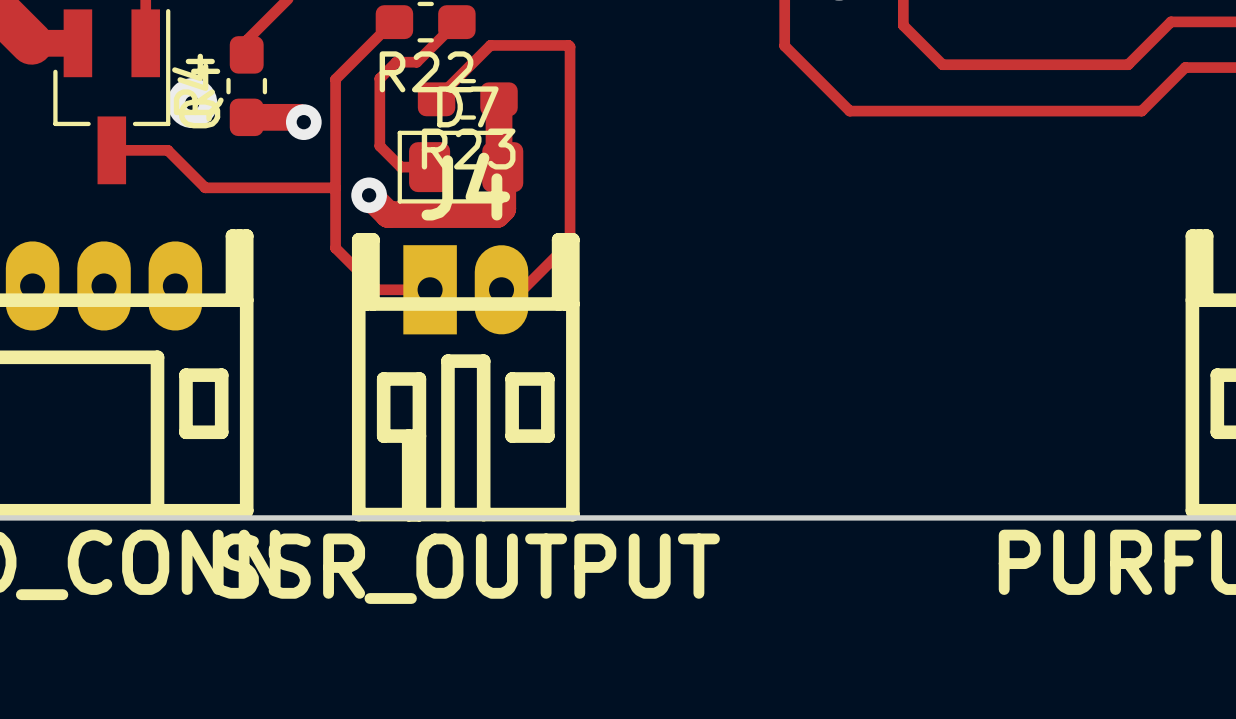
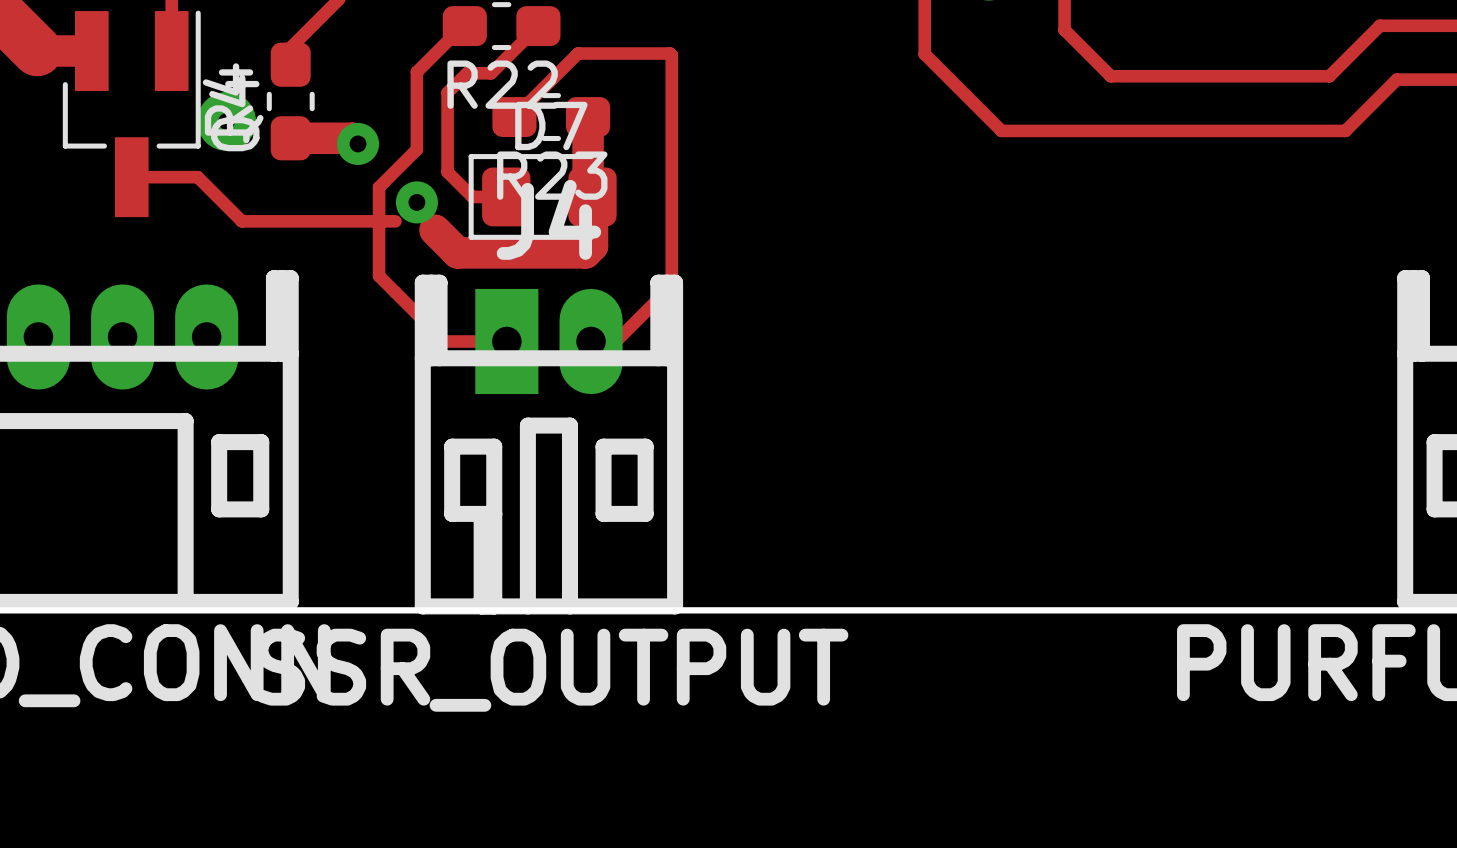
track: (353, 61) (335, 79) (335, 248) -> (416, 72) (416, 149) (379, 187) (379, 276) (395, 292)
via position: (369, 195) -> (416, 202)

